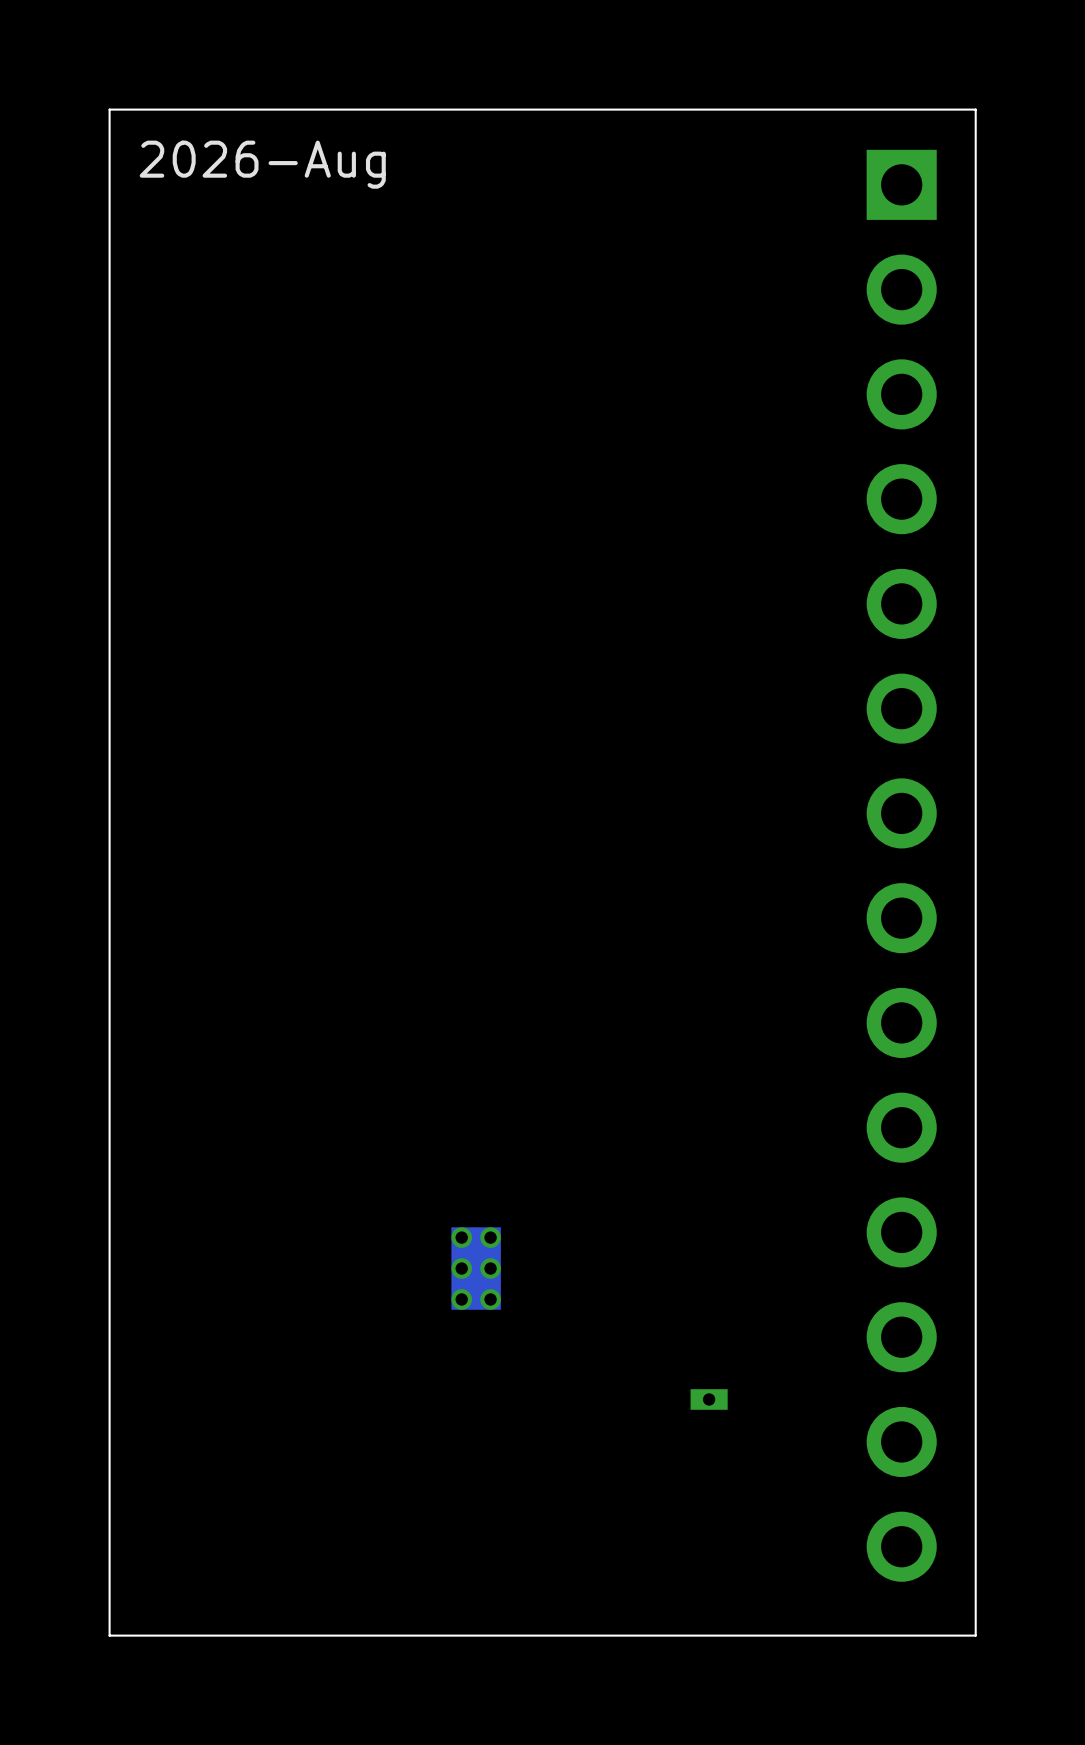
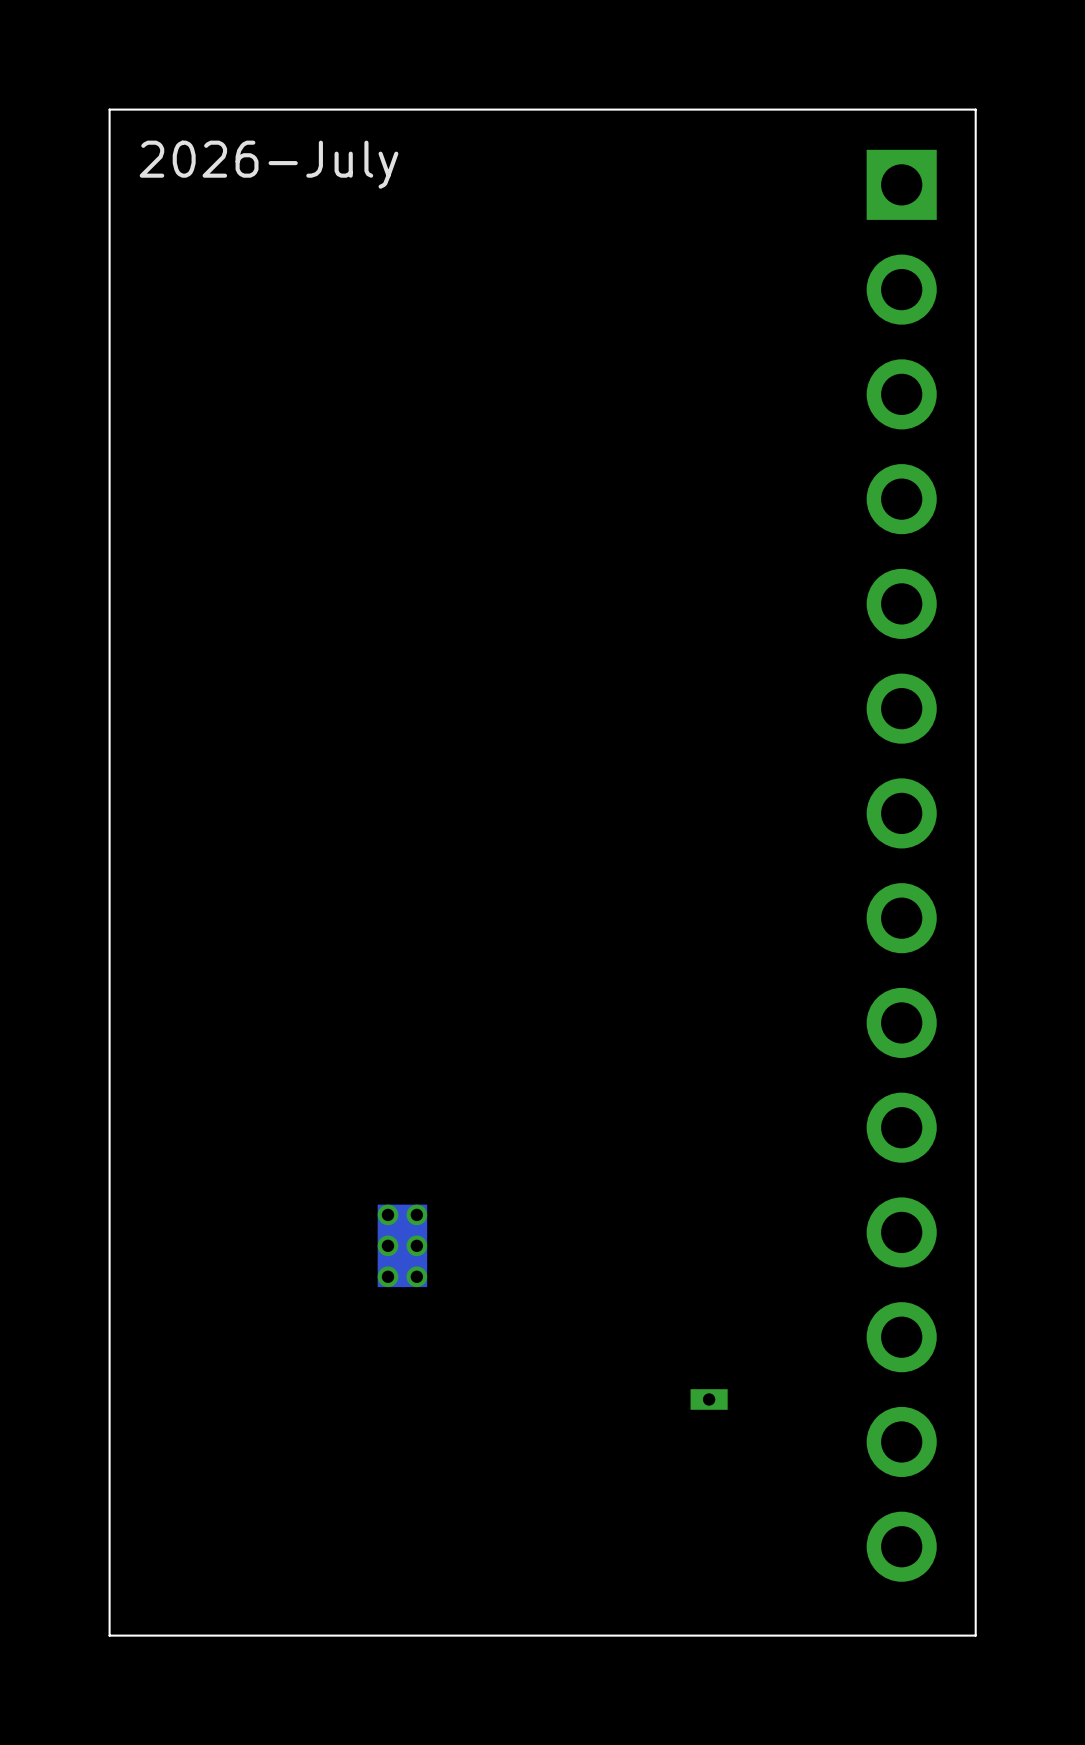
text: 2026-Aug (262, 164) -> 2026-July (269, 164)
part position: (476, 1268) -> (402, 1245)

